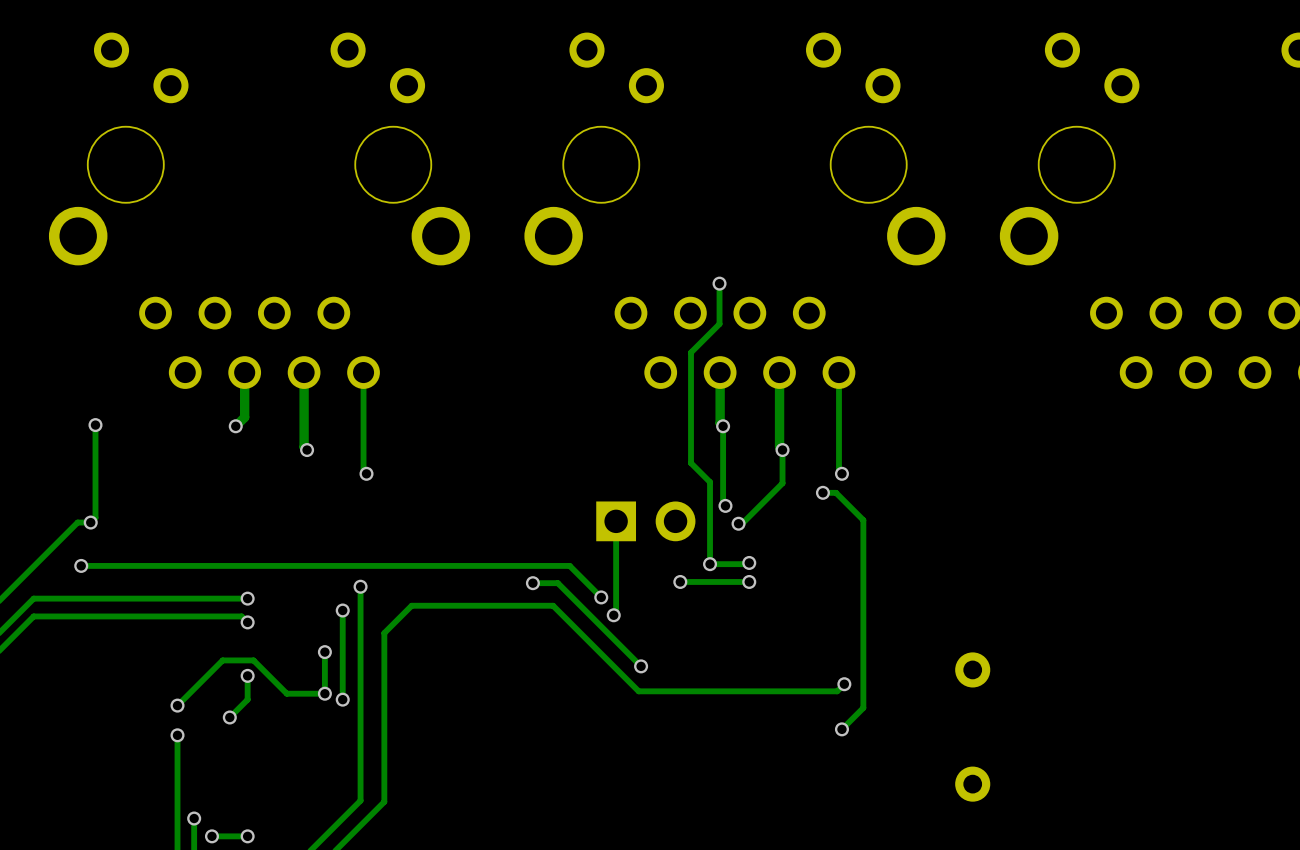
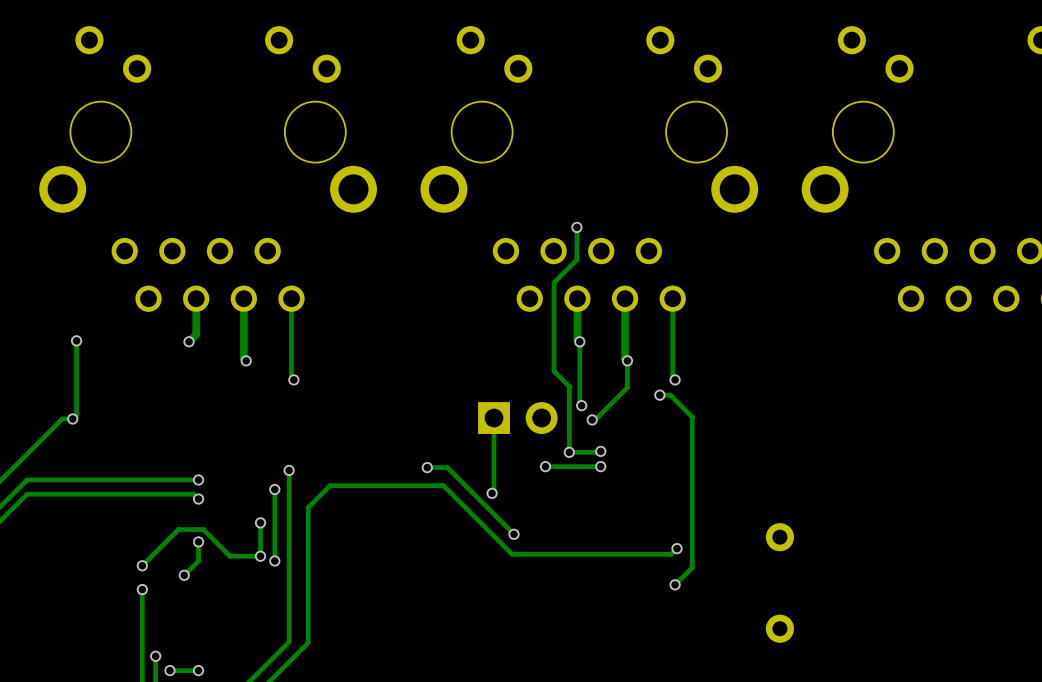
track: (81, 565) (569, 565) (601, 597) -> none
via: (81, 565) -> none
via: (601, 597) -> none

